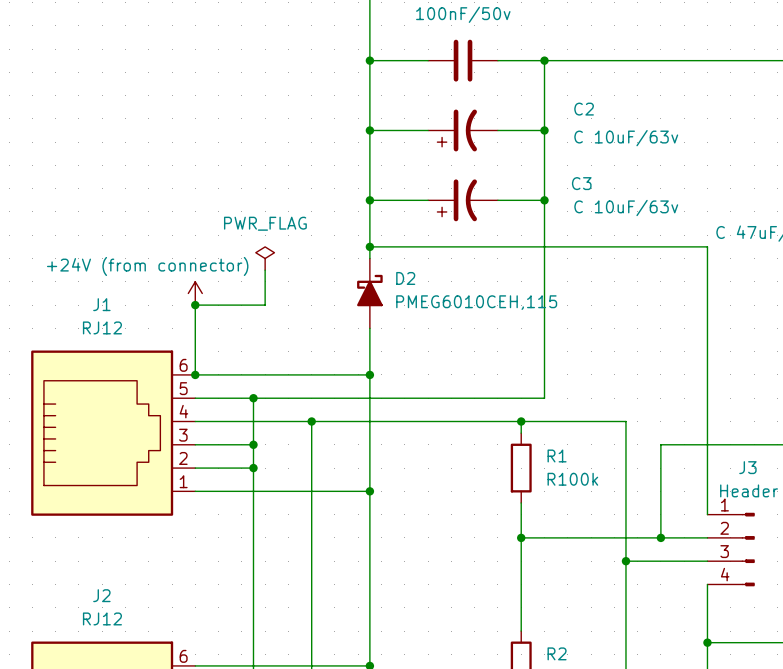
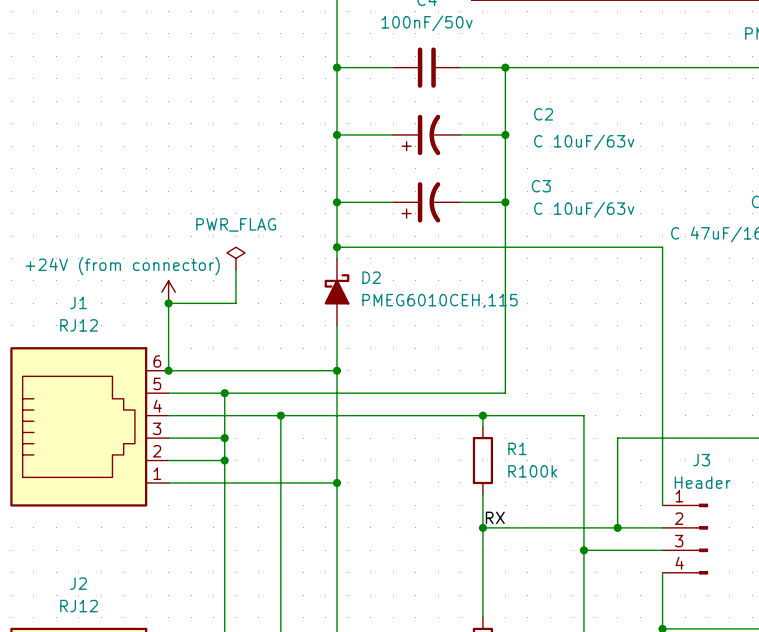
label: none -> RX (495, 517)

